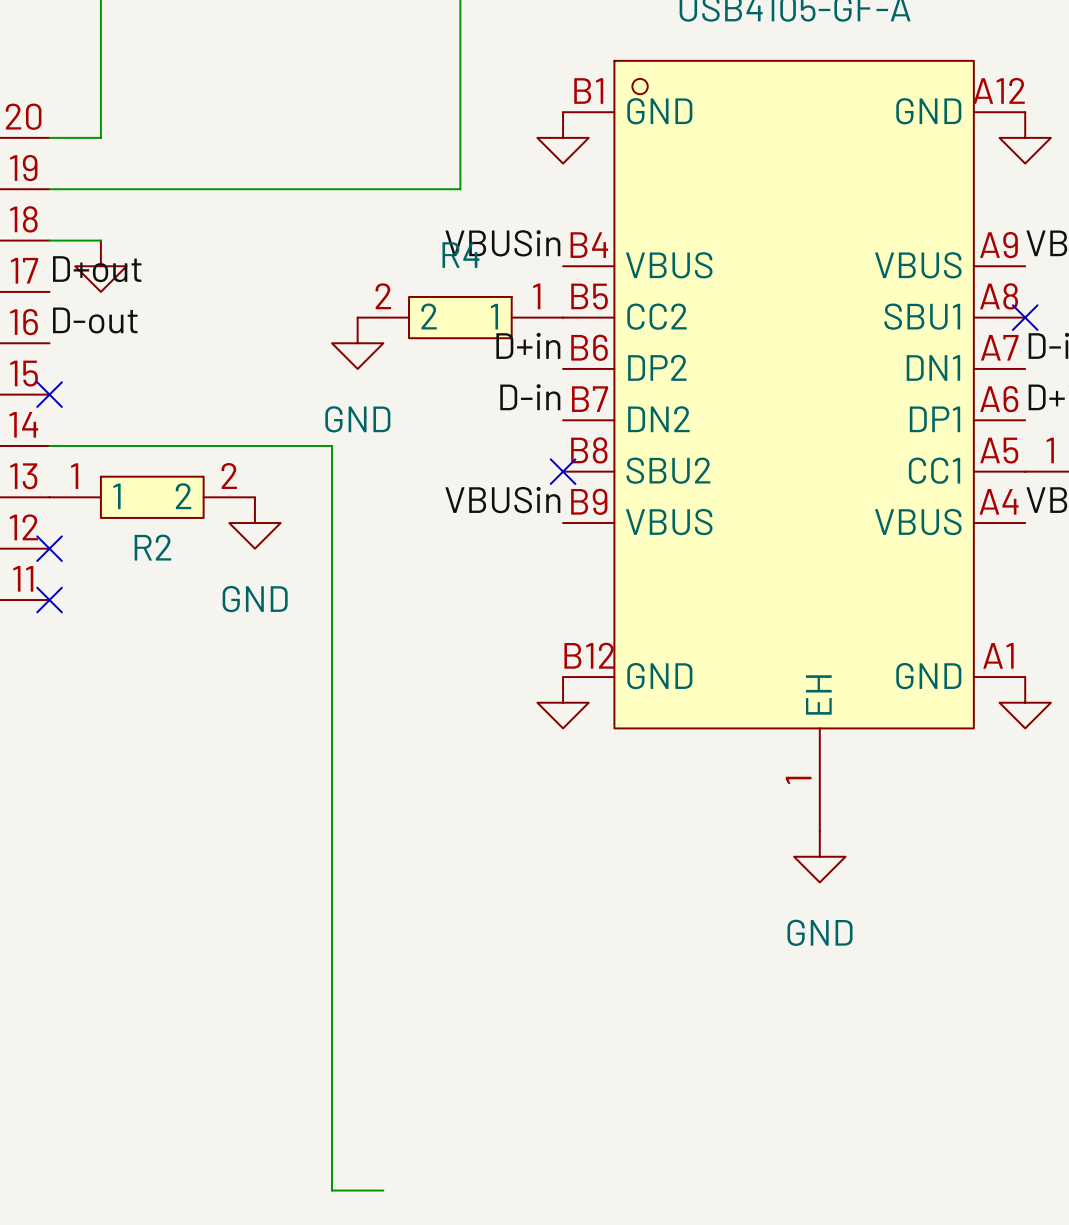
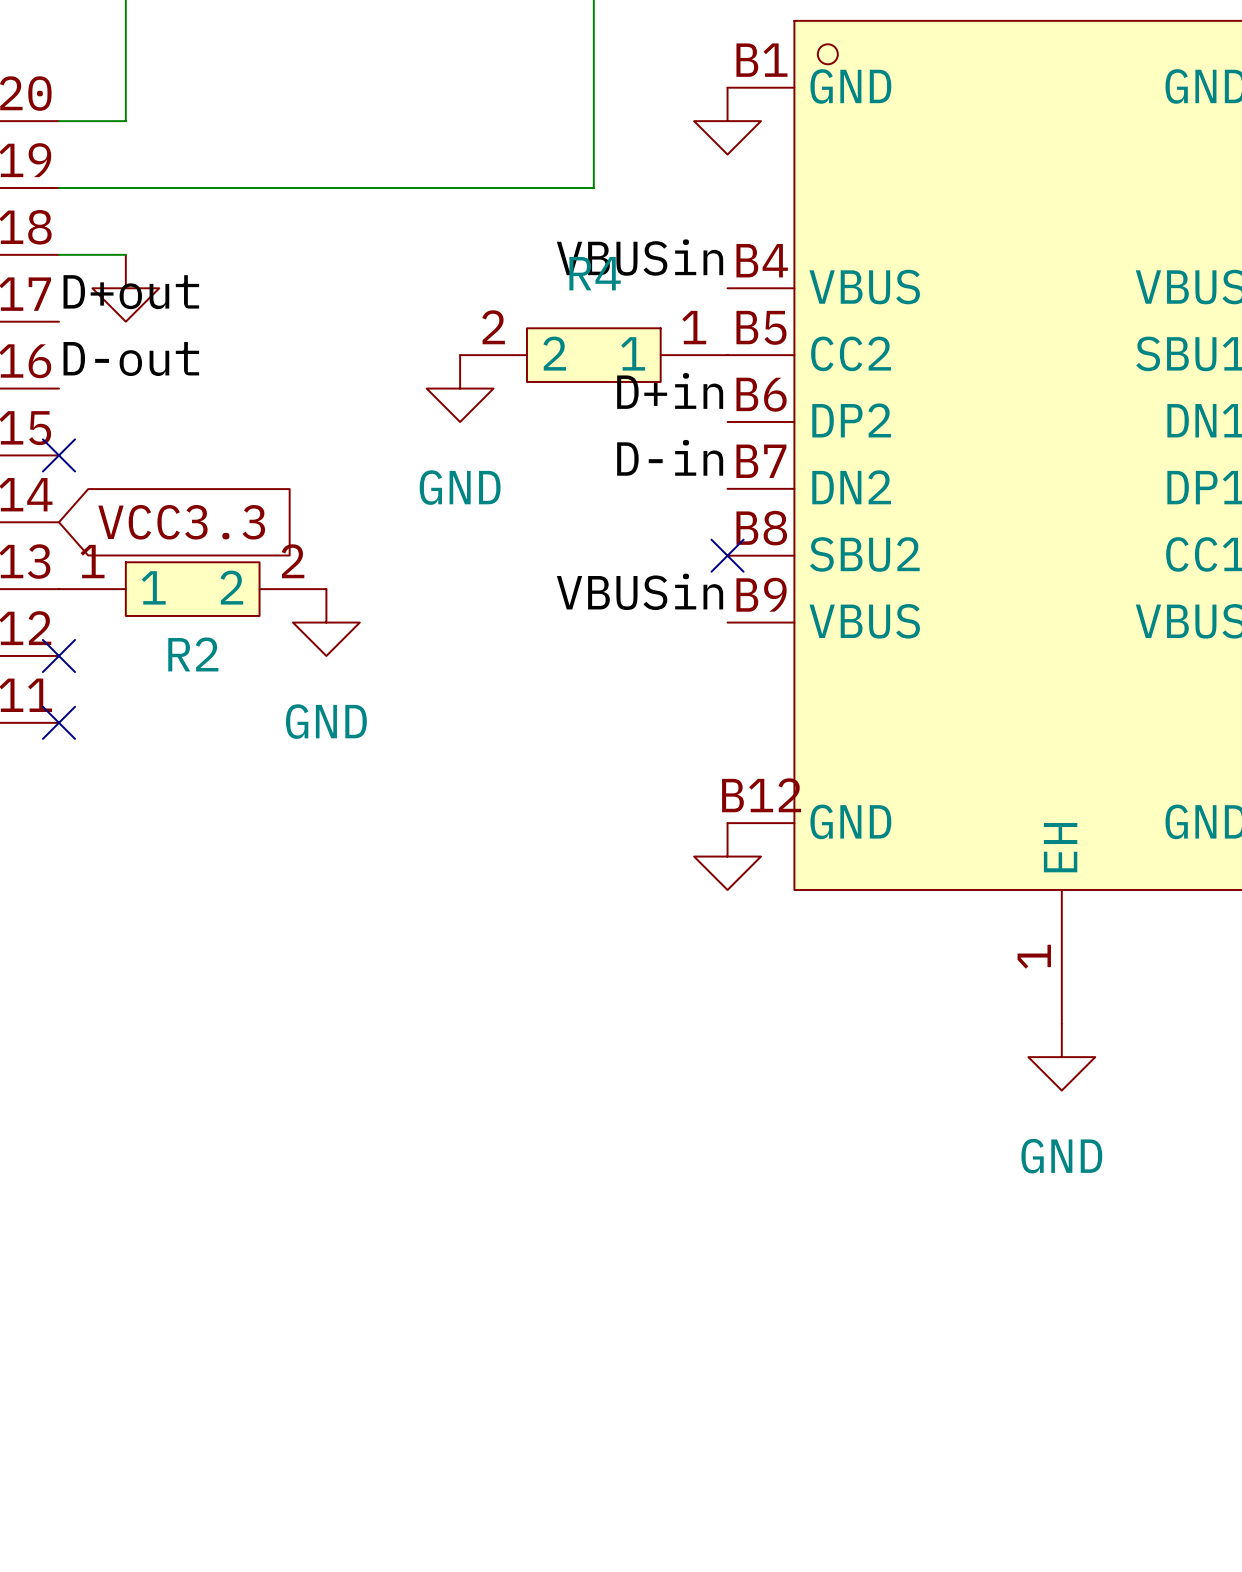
wire: (49, 445) (331, 445) (331, 1190) (383, 1190) -> none
global label: none -> VCC3.3 (181, 522)

